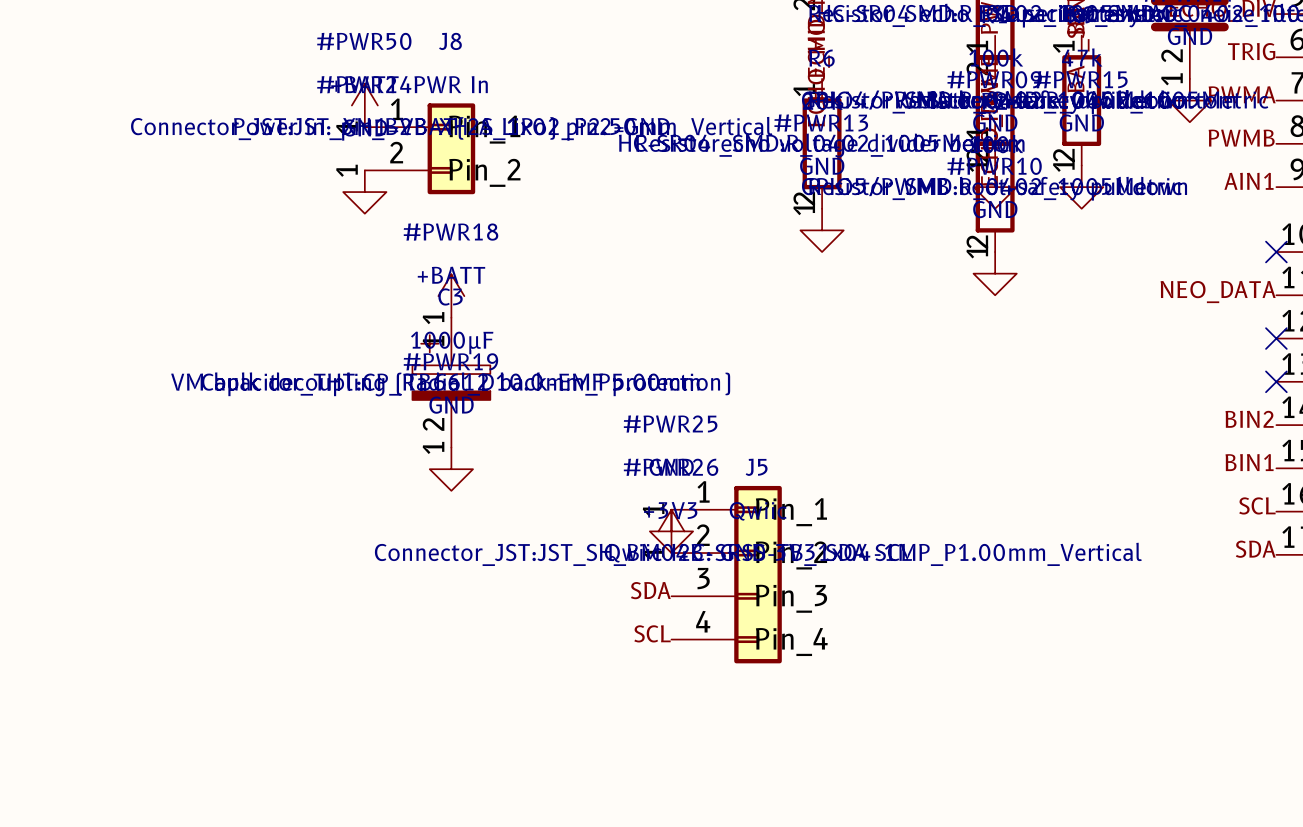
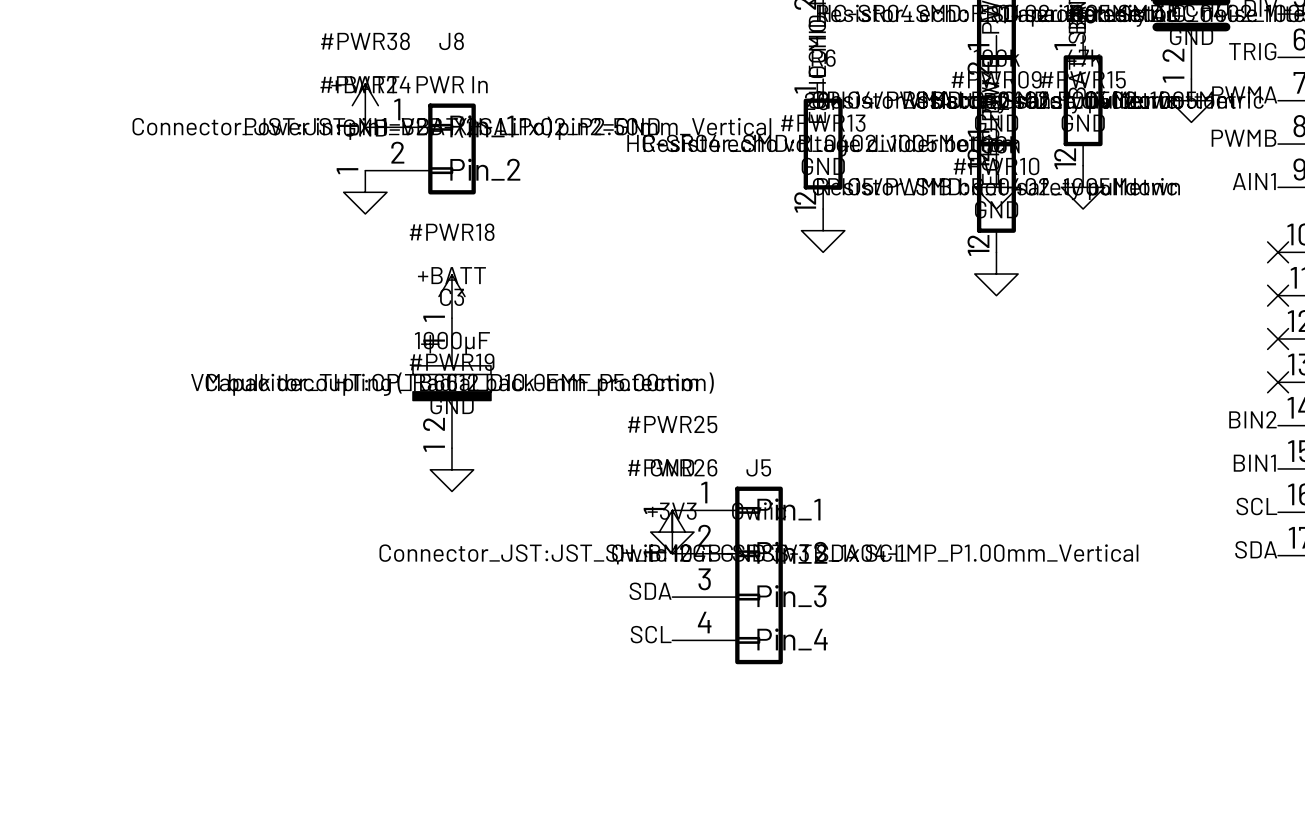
#PWR50 name: #PWR50 (364, 41) -> #PWR38 (365, 41)
label: NEO_DATA (1218, 292) -> none
no-connect mark: none -> (1278, 295)

